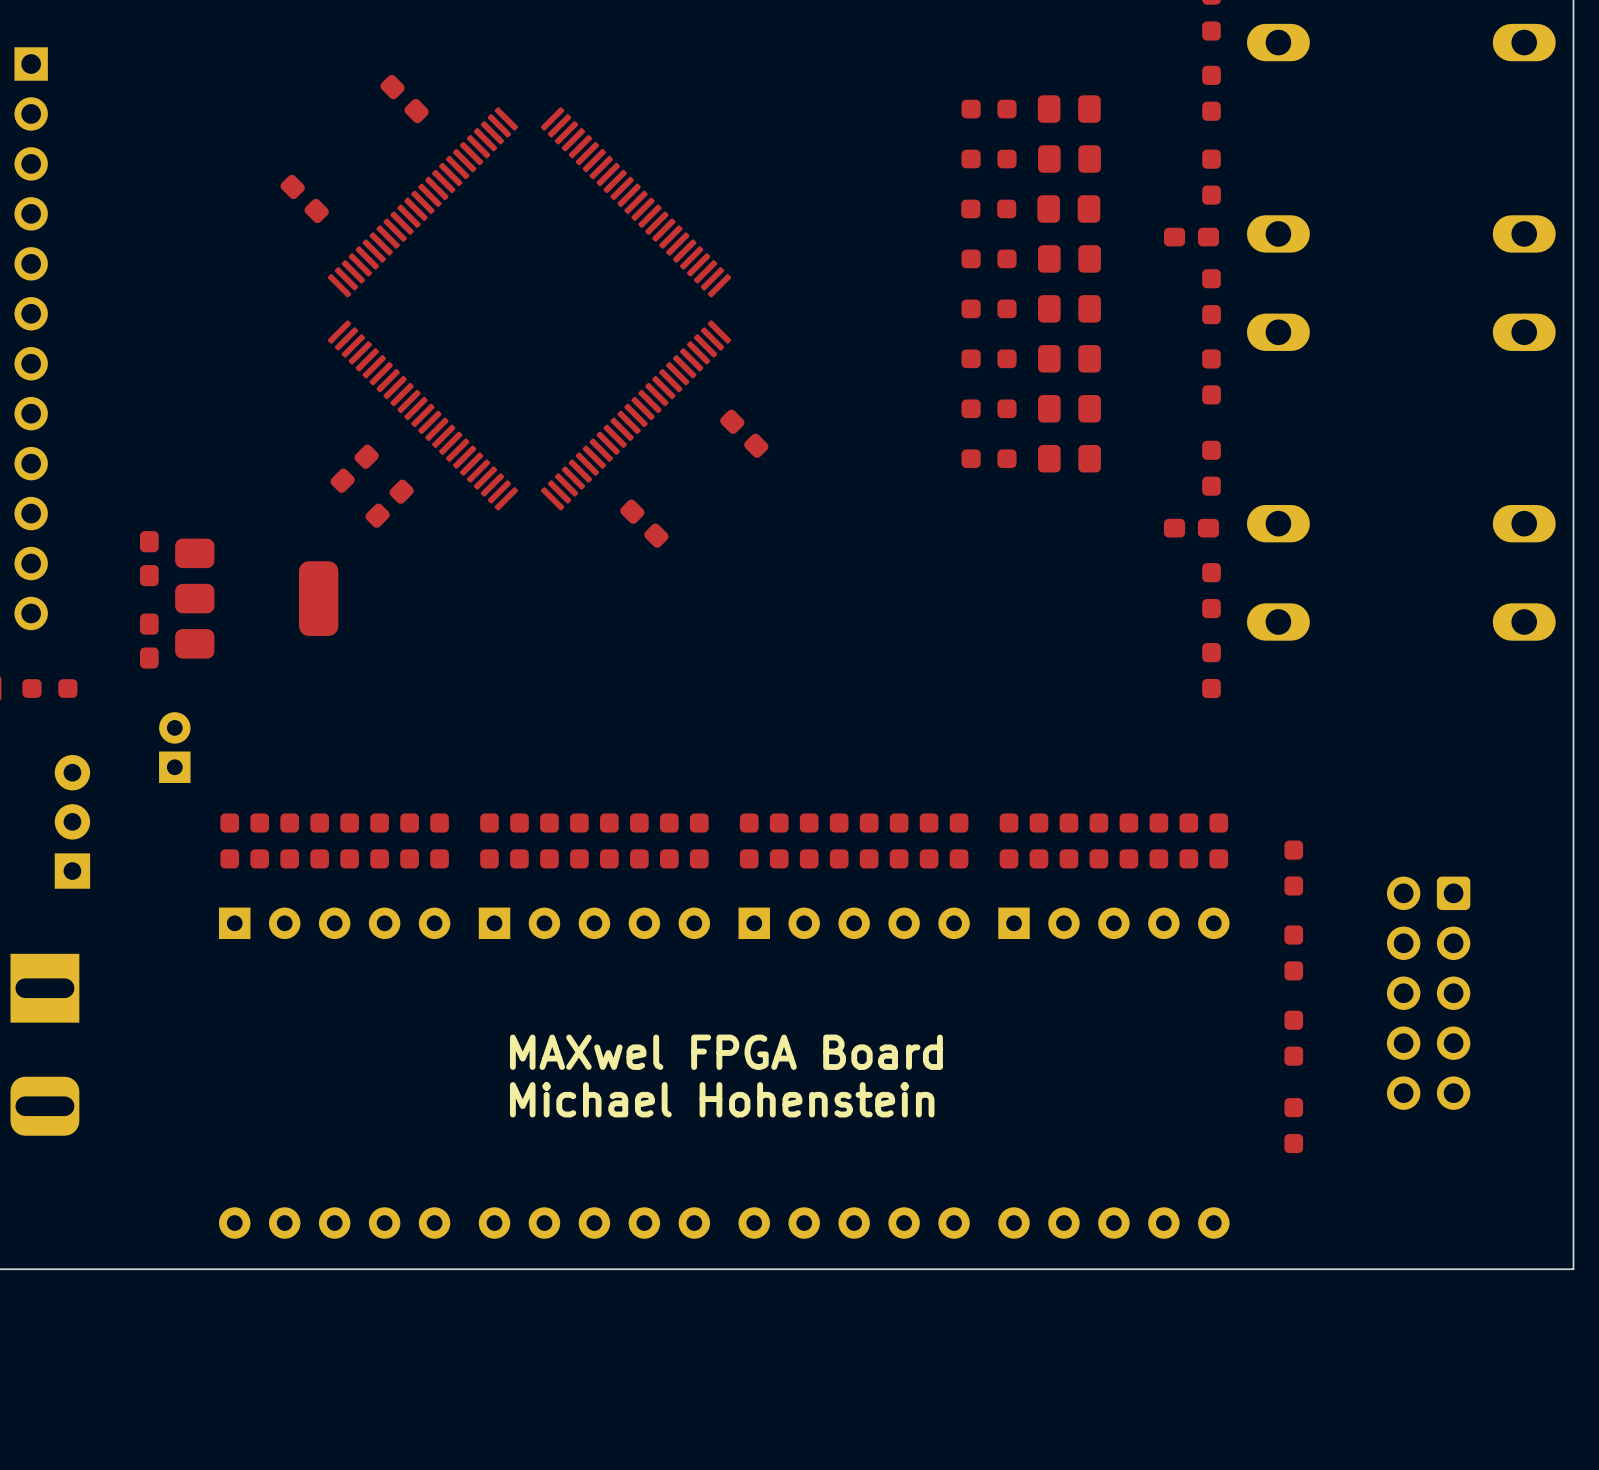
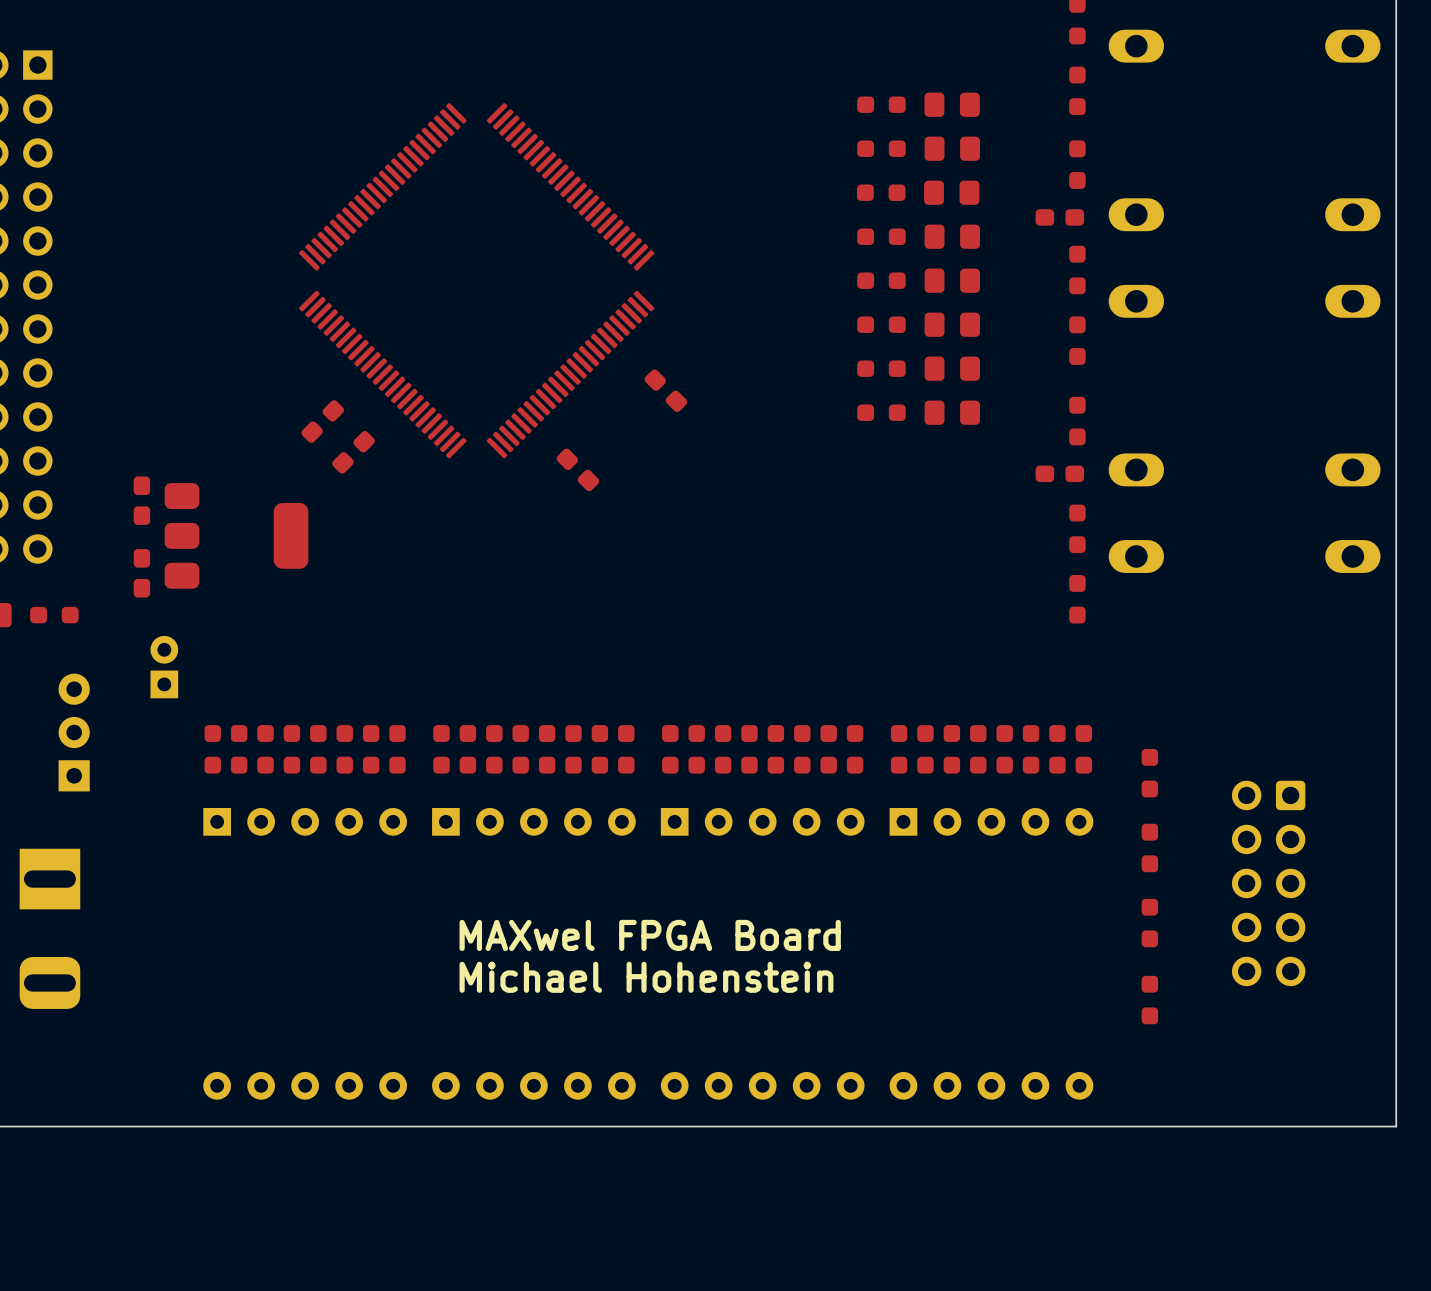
part: (404, 99) -> none
part: (304, 198) -> none

